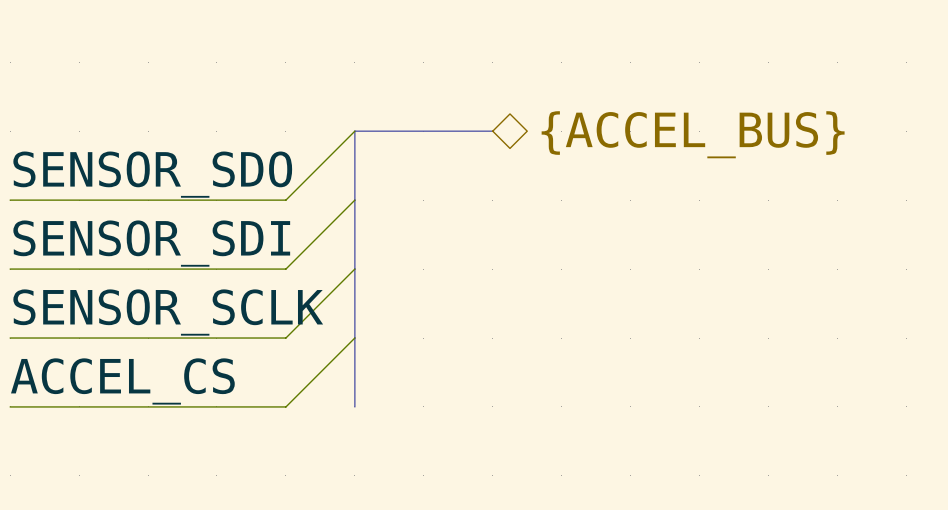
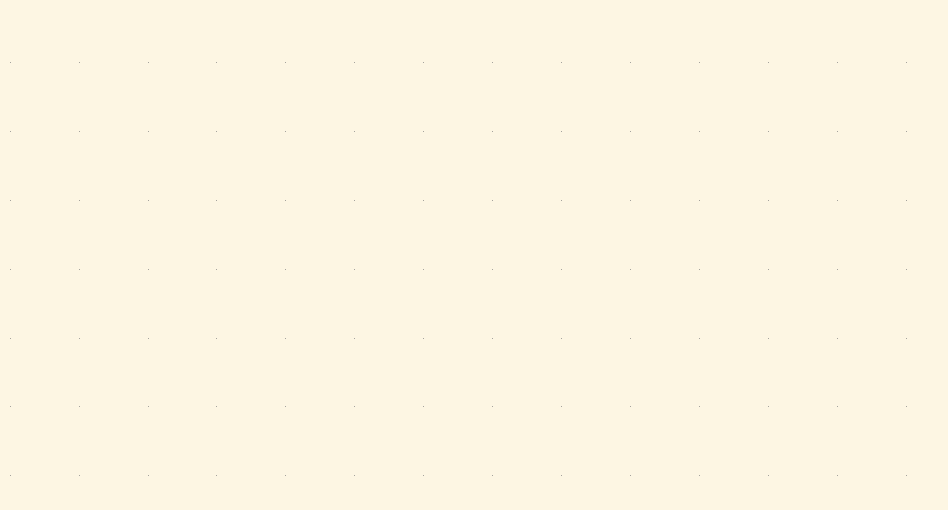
wire: (354, 131) (285, 200) (10, 200) -> none
bus: (492, 131) (354, 131) (354, 406) -> none
hierarchical label: {ACCEL_BUS} (693, 134) -> none
label: SENSOR_SDO (152, 174) -> none
wire: (354, 200) (285, 269) (10, 269) -> none
label: SENSOR_SDI (151, 243) -> none
wire: (354, 269) (285, 338) (10, 338) -> none
label: SENSOR_SCLK (168, 312) -> none
wire: (354, 338) (285, 406) (10, 406) -> none
label: ACCEL_CS (122, 381) -> none

